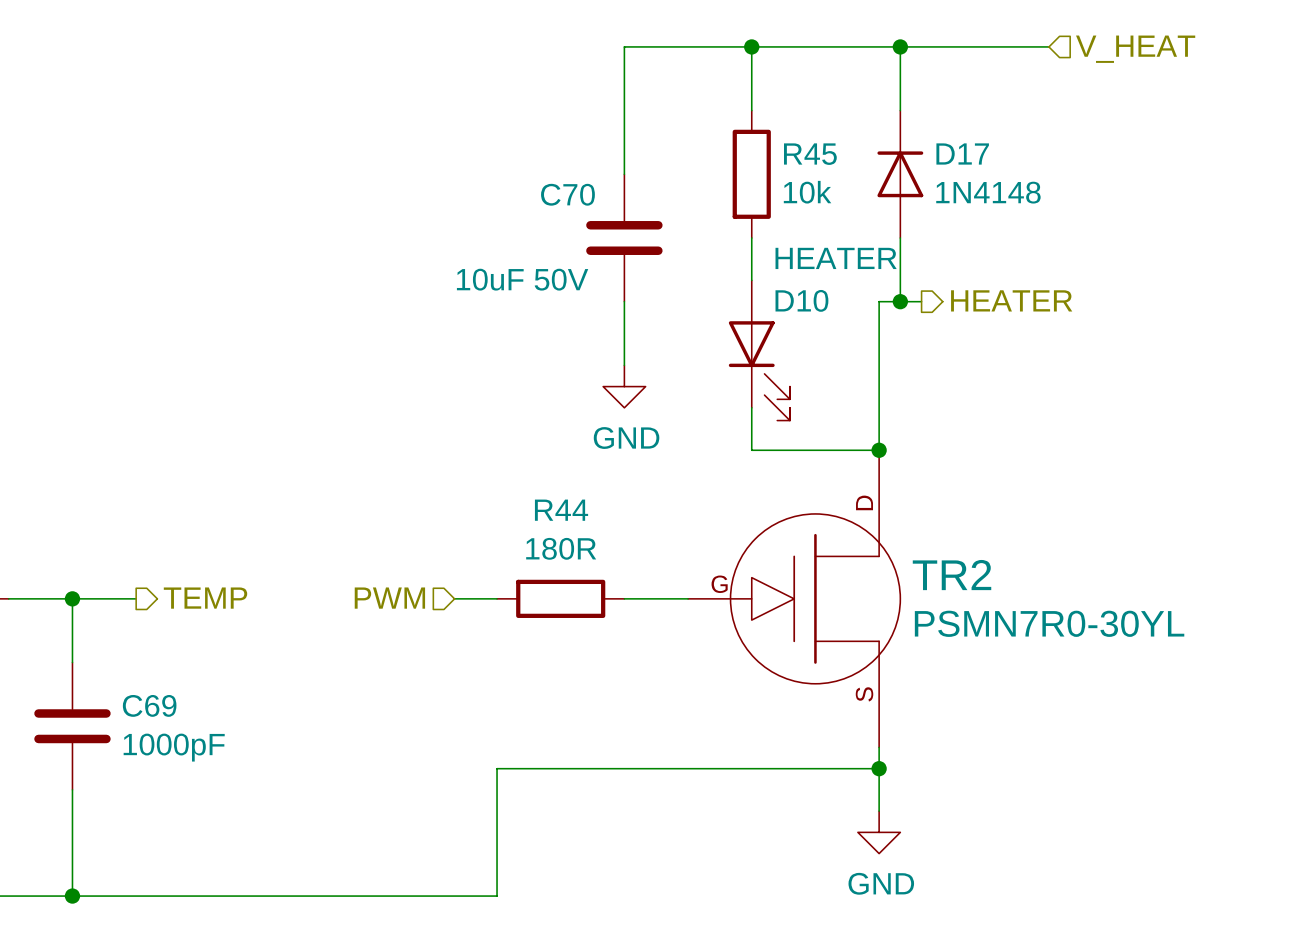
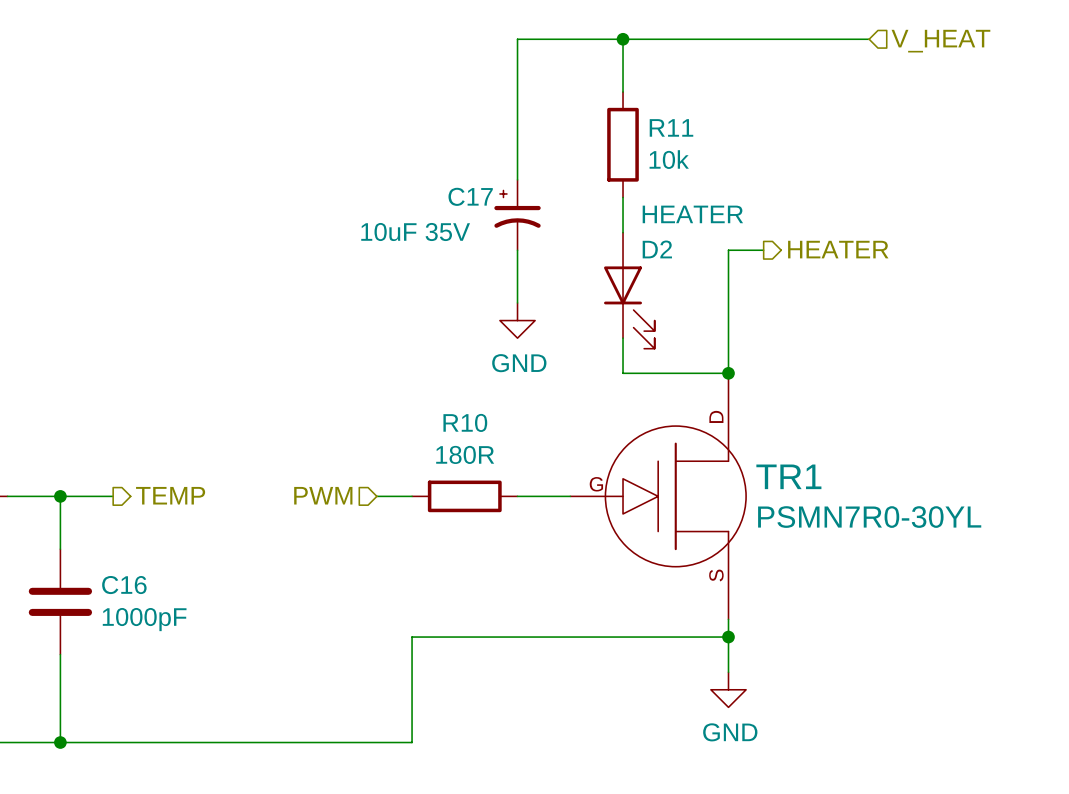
wire: (900, 46) (900, 110) -> none
junction: (900, 46) -> none
R45 name: R45 (810, 154) -> R11 (671, 127)
D17: 1N4148 (900, 174) -> none
C70: 10uF 50V (624, 238) -> none
wire: (900, 238) (900, 301) -> none
C17: none -> 10uF 35V (517, 215)
D10 name: D10 (801, 300) -> D2 (657, 249)
junction: (900, 301) -> none
R44 name: R44 (561, 510) -> R10 (465, 422)
TR2 name: TR2 (952, 575) -> TR1 (788, 476)
C69 name: C69 (149, 705) -> C16 (124, 585)

